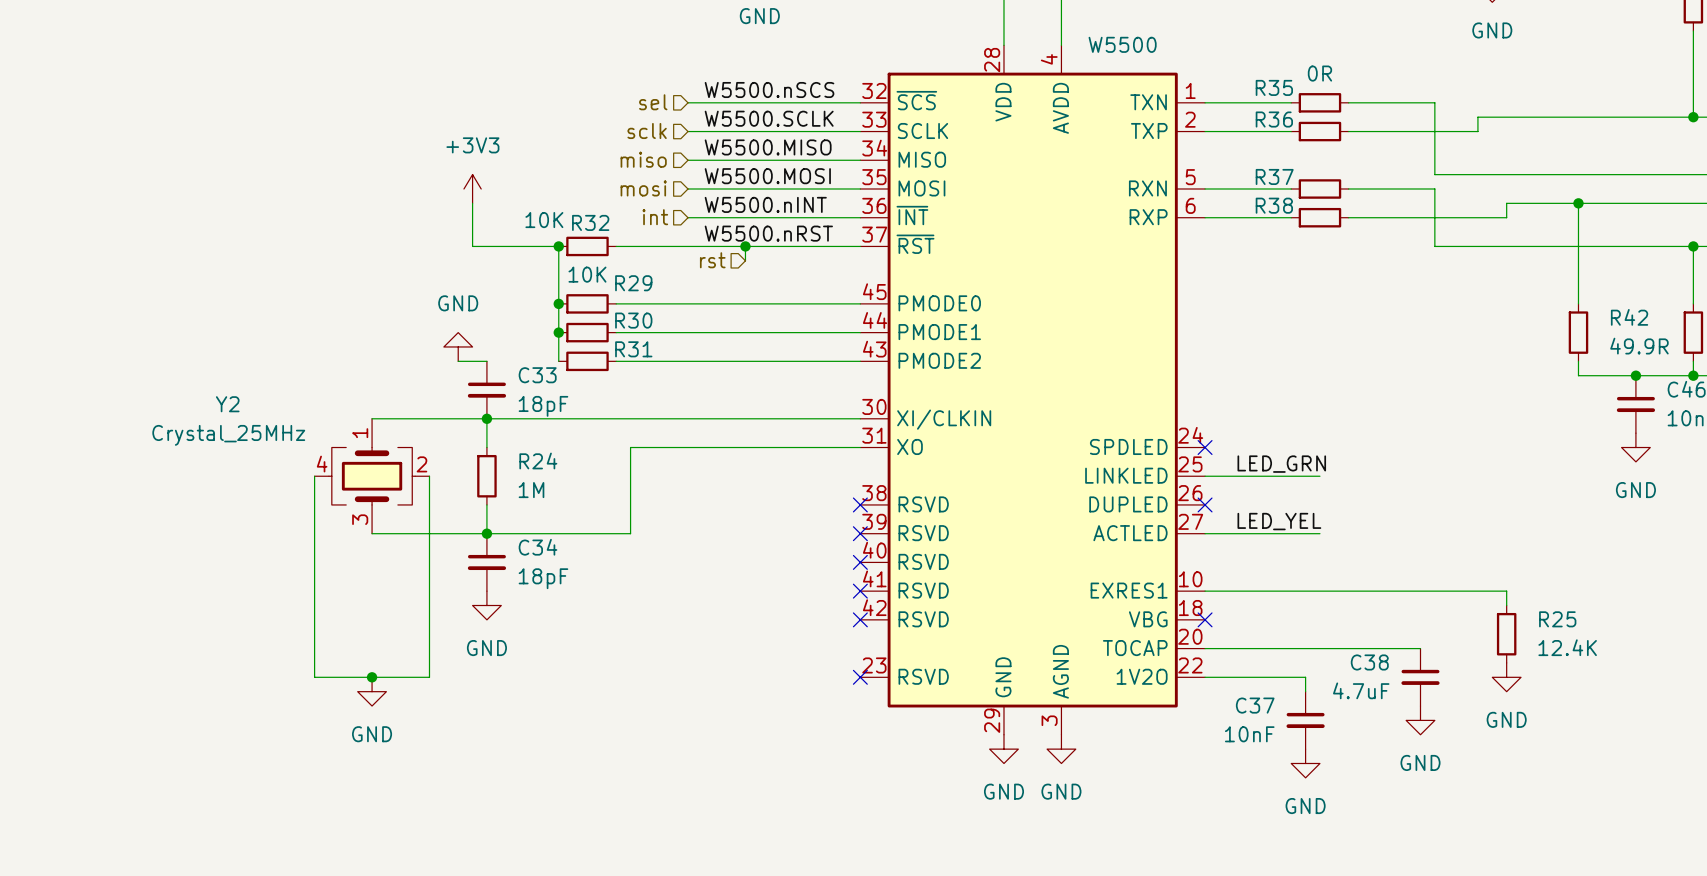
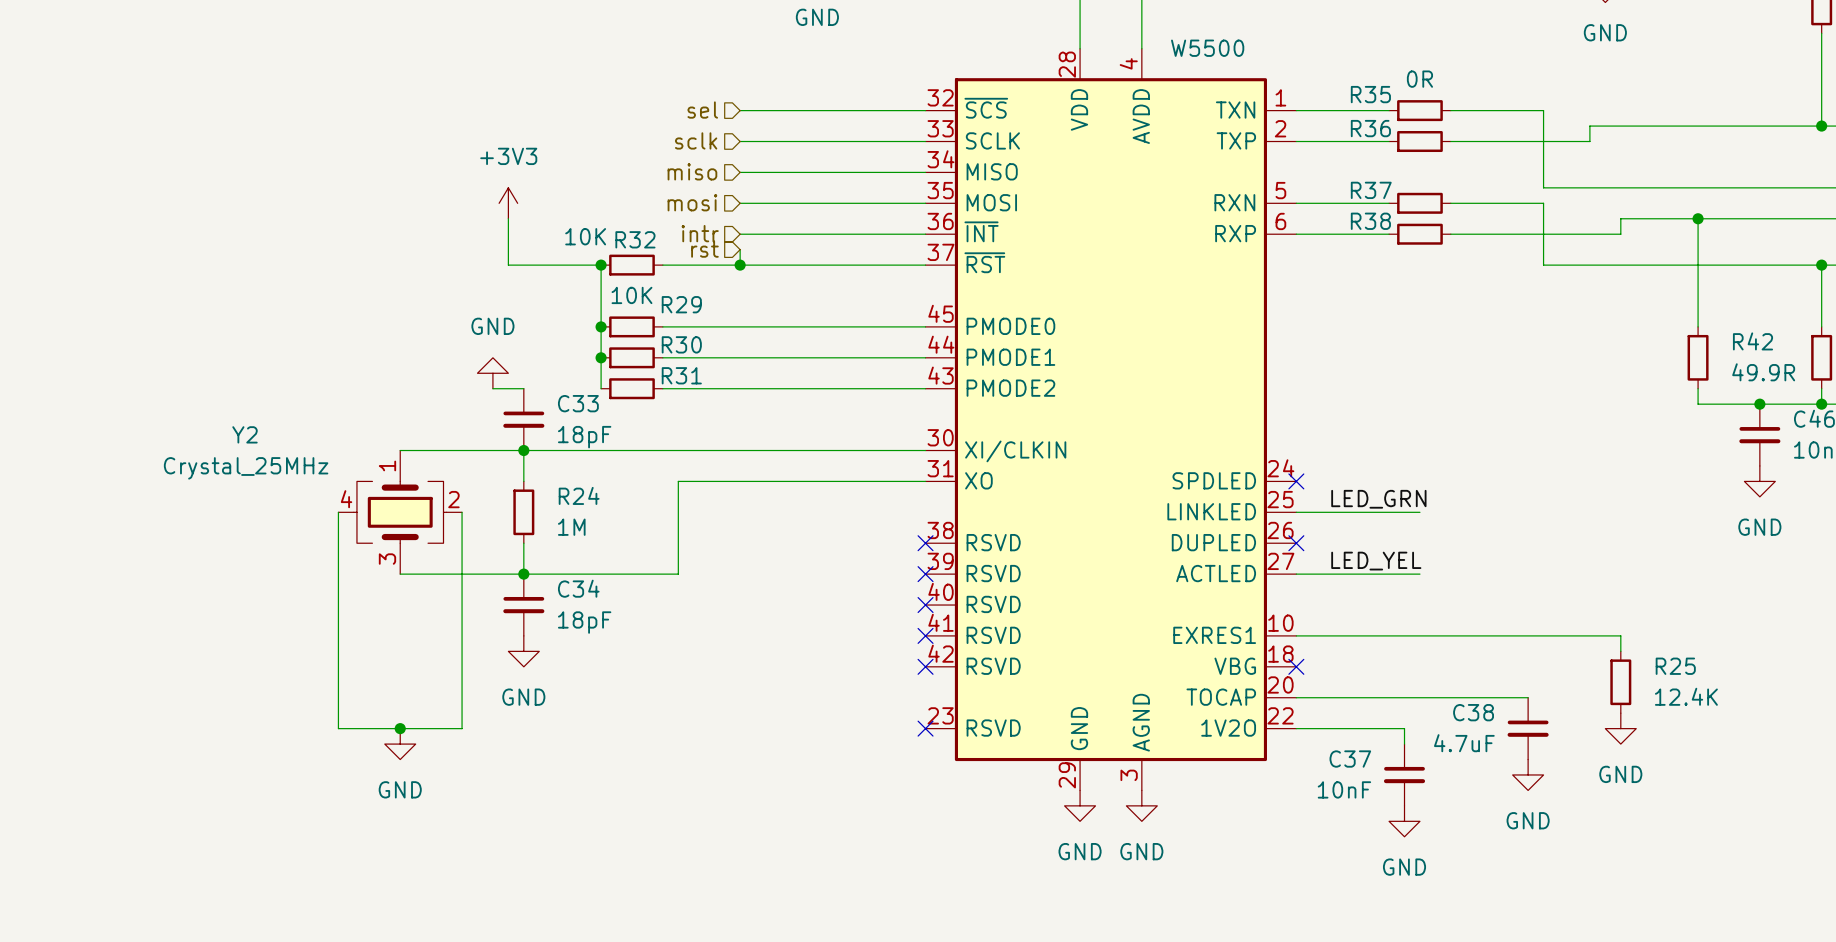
label: W5500.nSCS (769, 90) -> none
label: W5500.SCLK (769, 118) -> none
label: W5500.MISO (768, 147) -> none
label: W5500.MOSI (767, 176) -> none
label: W5500.nINT (765, 204) -> none
hierarchical label: int (655, 217) -> intr (700, 233)
label: W5500.nRST (768, 233) -> none
wire: (745, 246) (745, 260) -> (740, 249) (740, 265)
junction position: (745, 246) -> (740, 265)
hierarchical label position: rst (712, 260) -> rst (704, 249)

